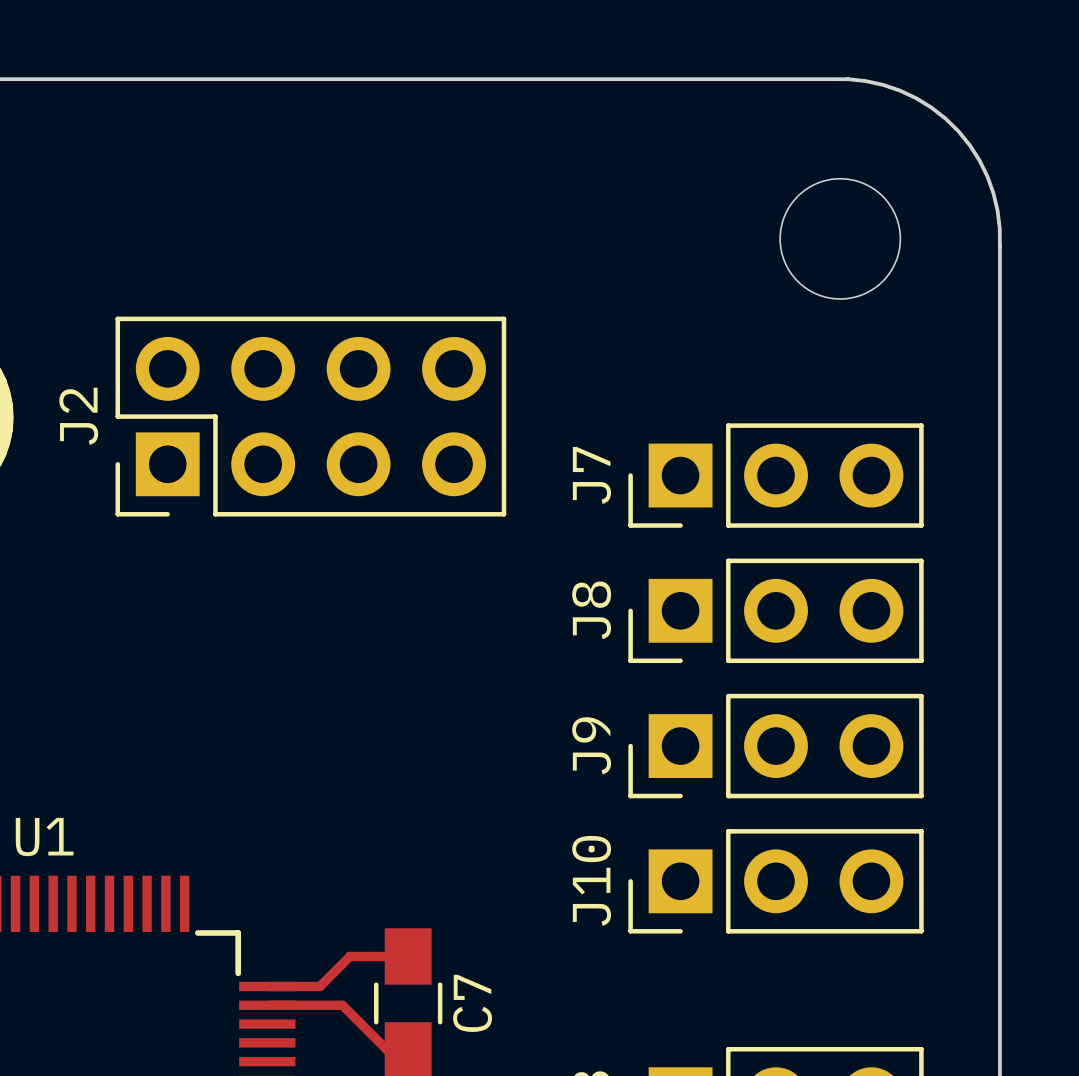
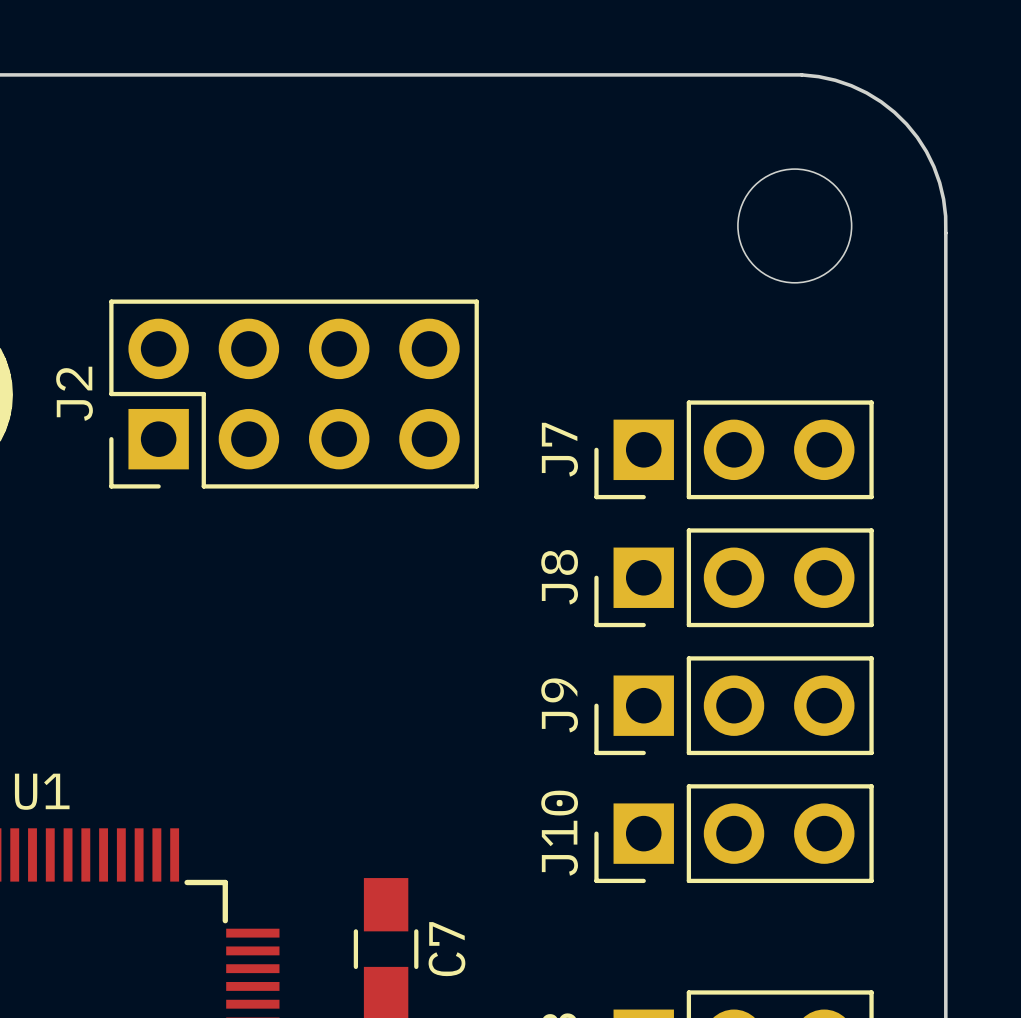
top track: (408, 956) (349, 956) (319, 986) (267, 986) -> none
top track: (267, 1005) (342, 1005) (387, 1050) (408, 1050) -> none

